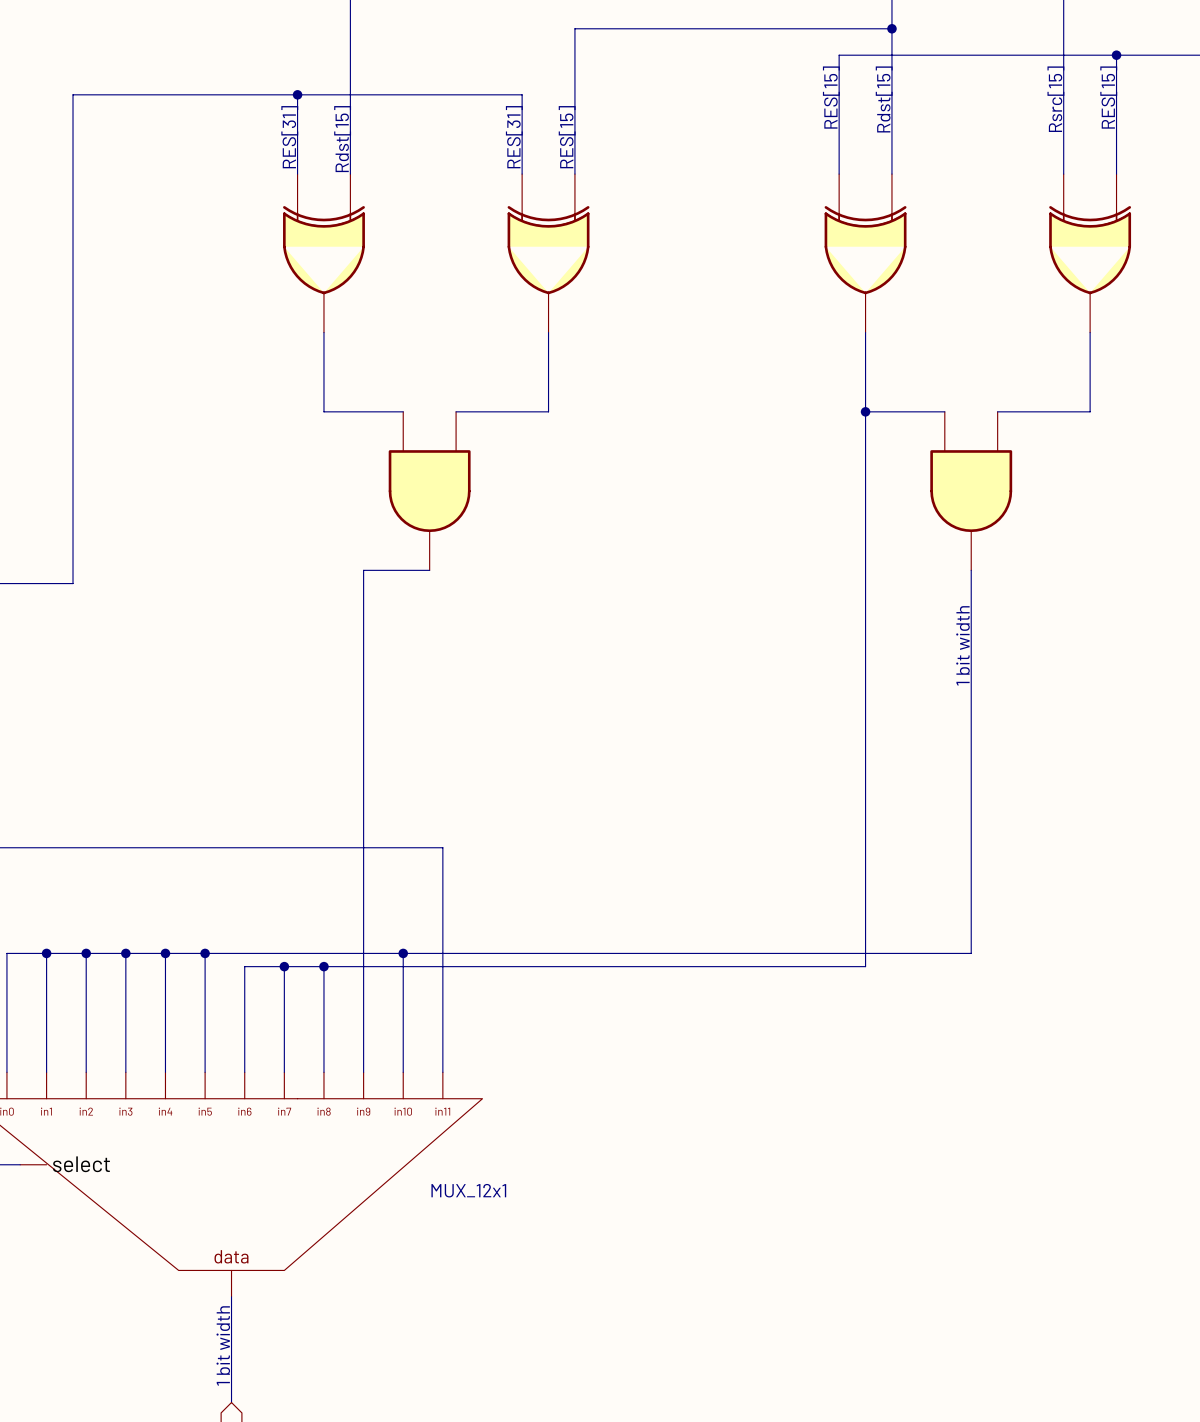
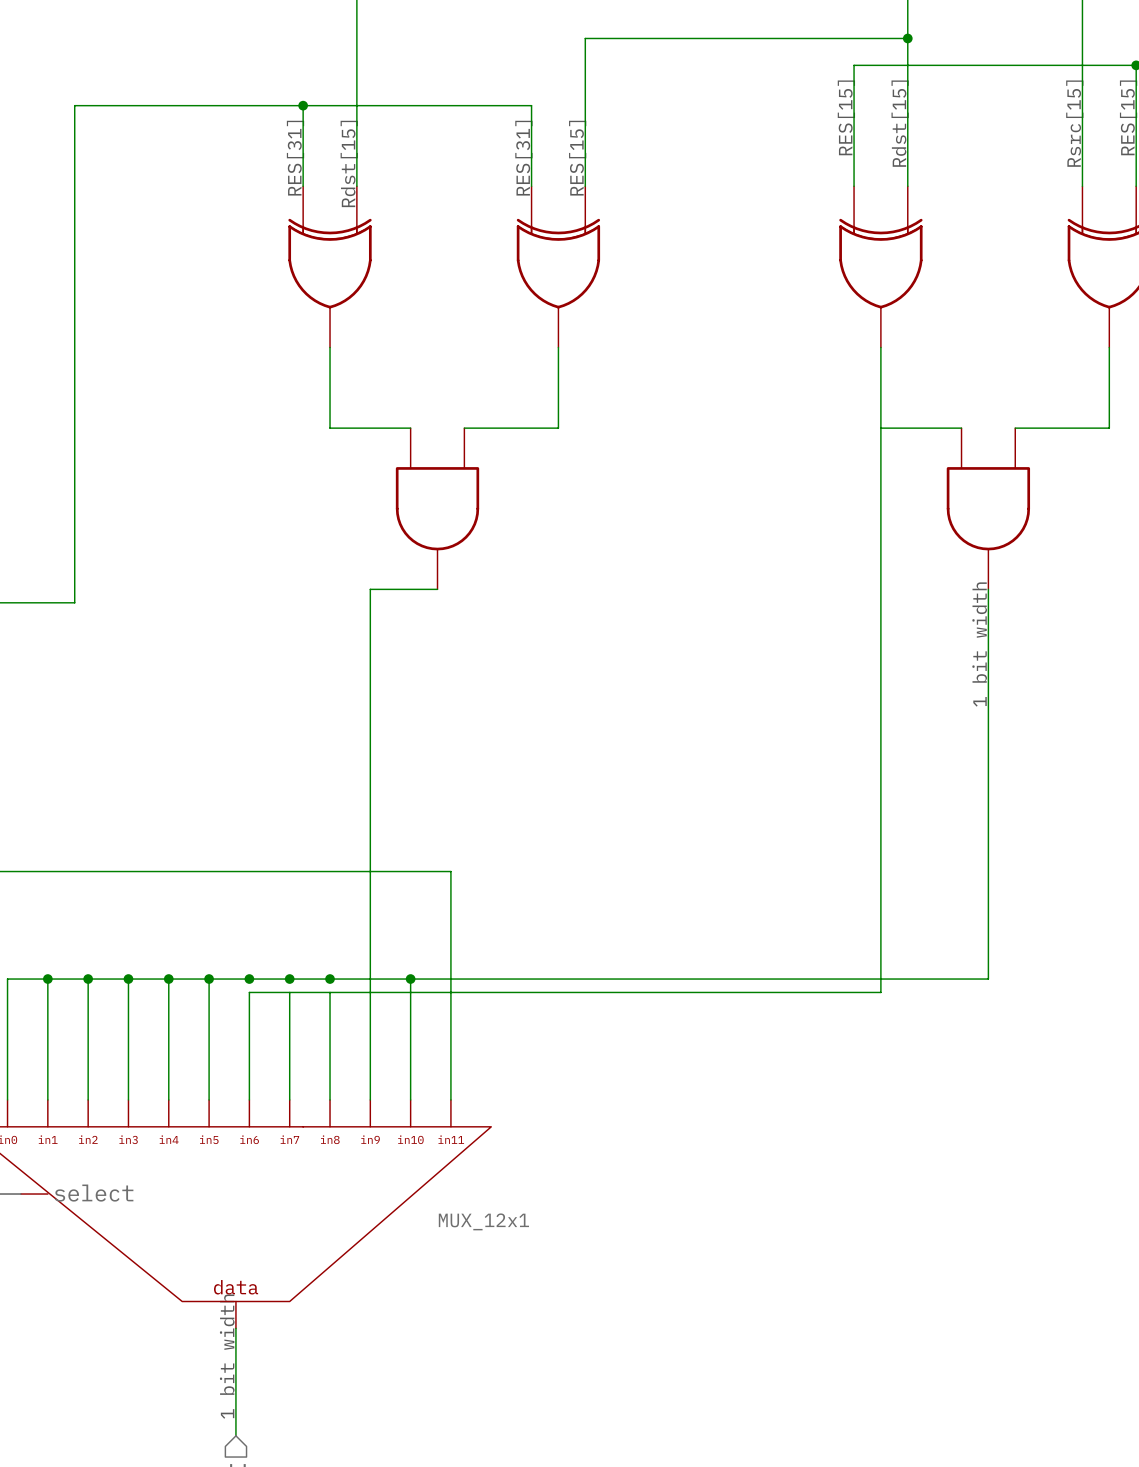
junction: (865, 411) -> none
junction: none -> (249, 979)
junction position: (284, 966) -> (289, 979)
junction position: (323, 966) -> (330, 979)

